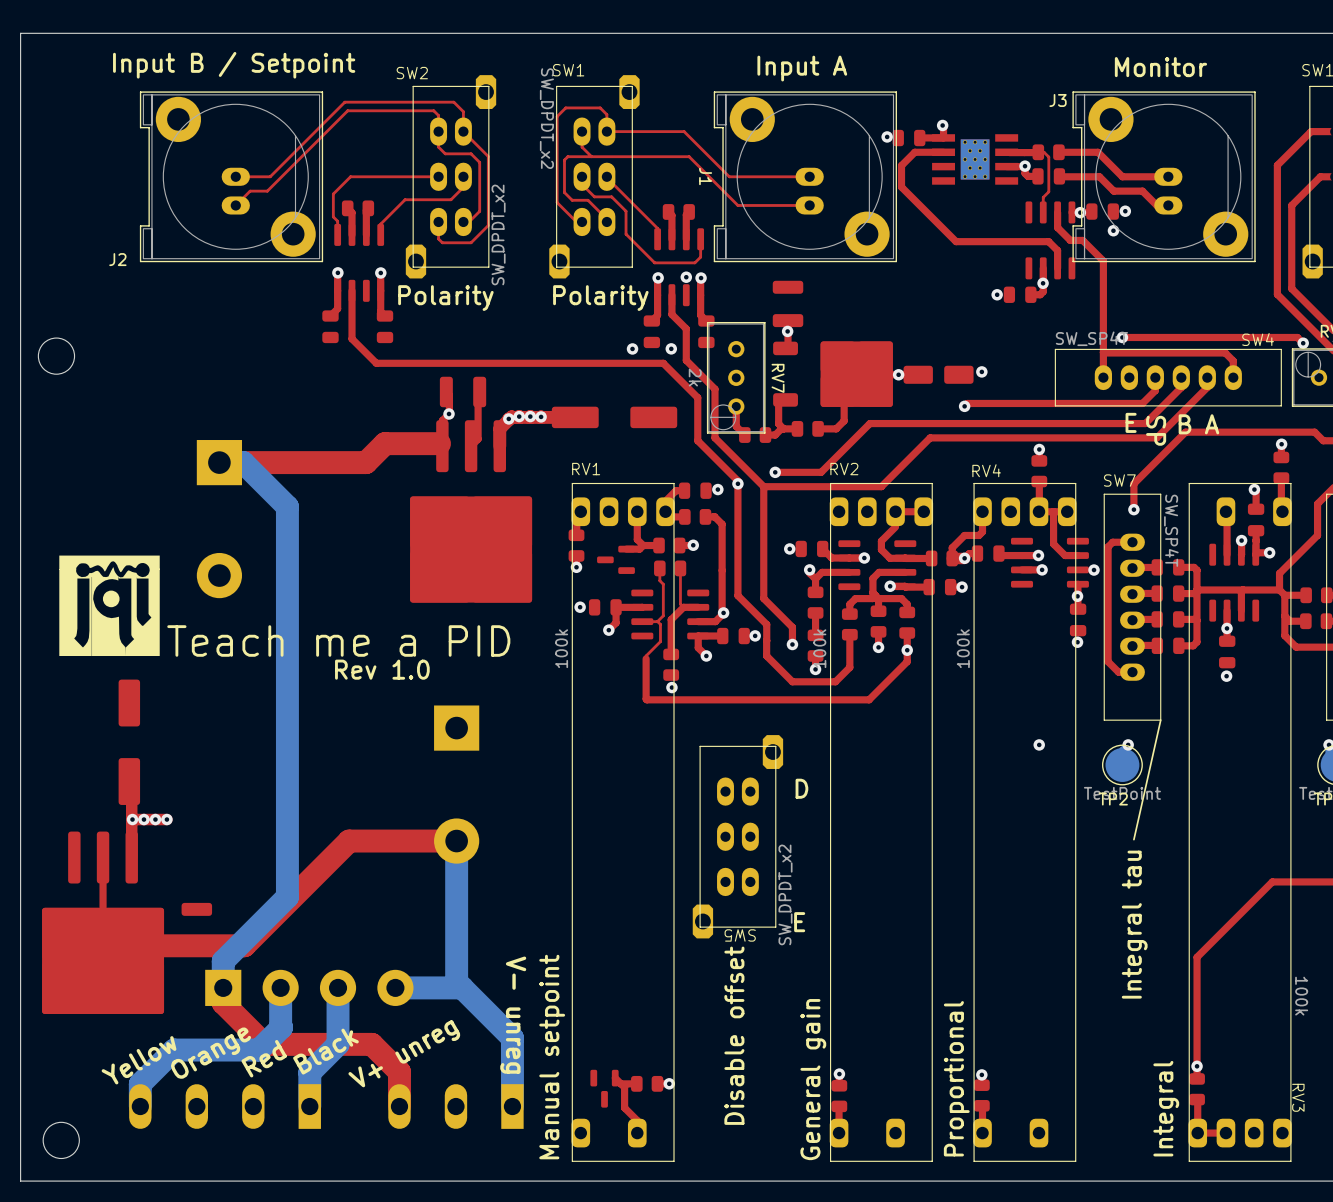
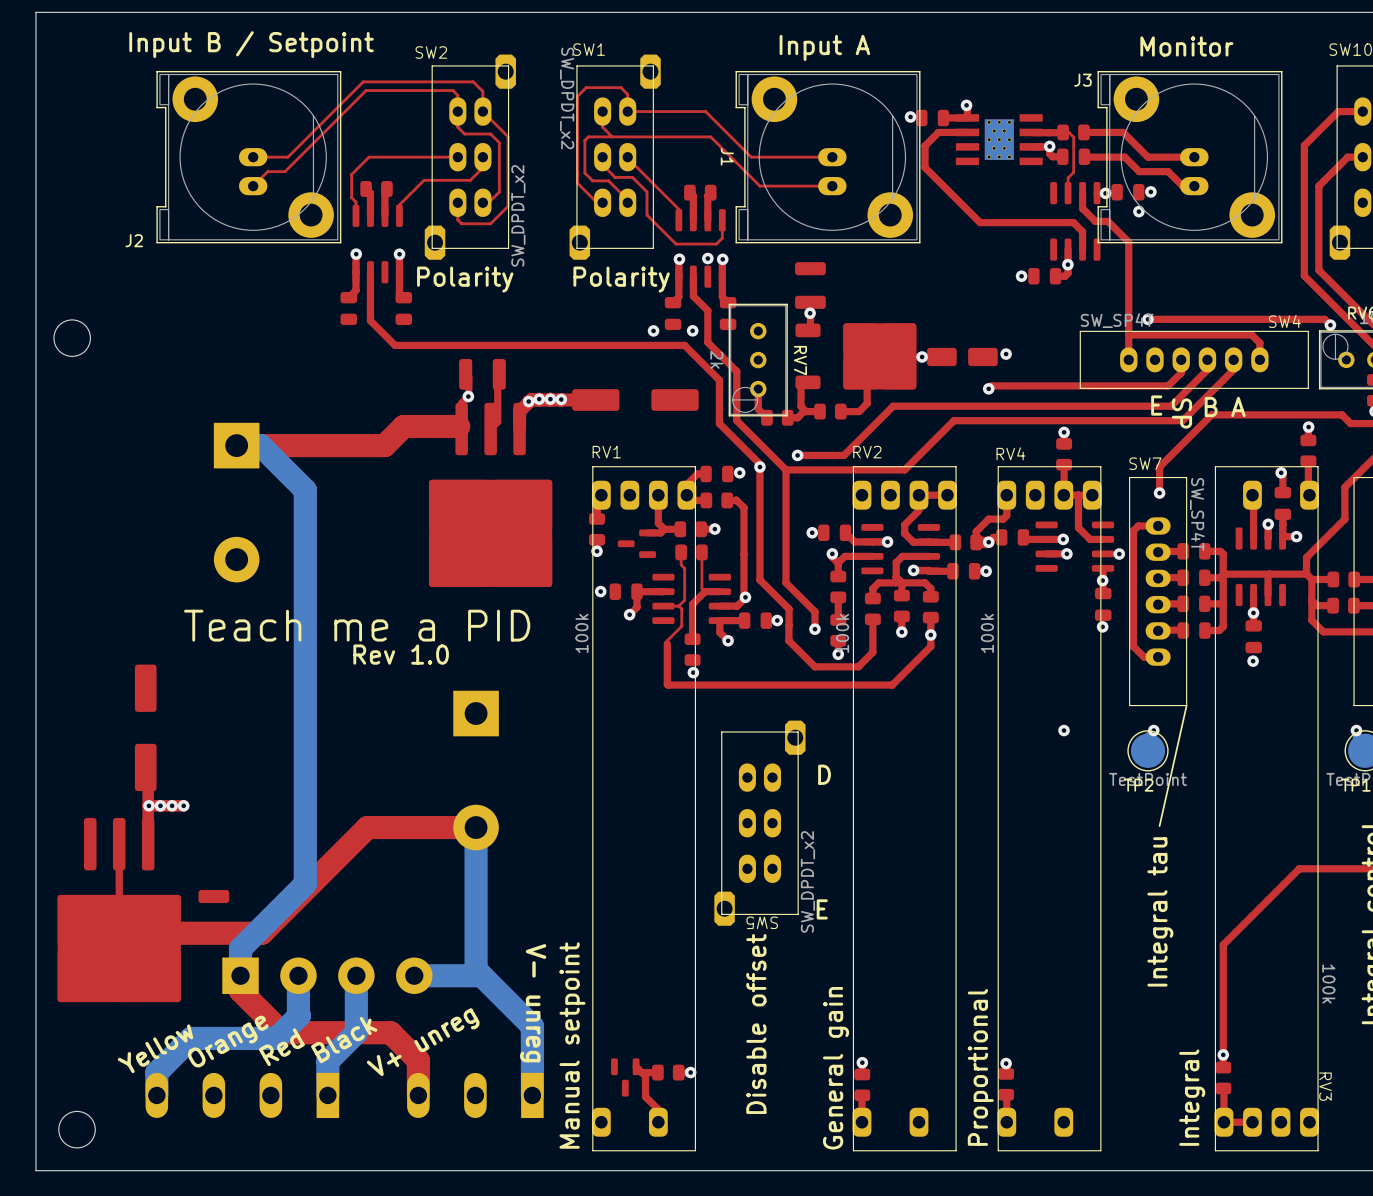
drawing: [59, 555, 160, 657] -> none

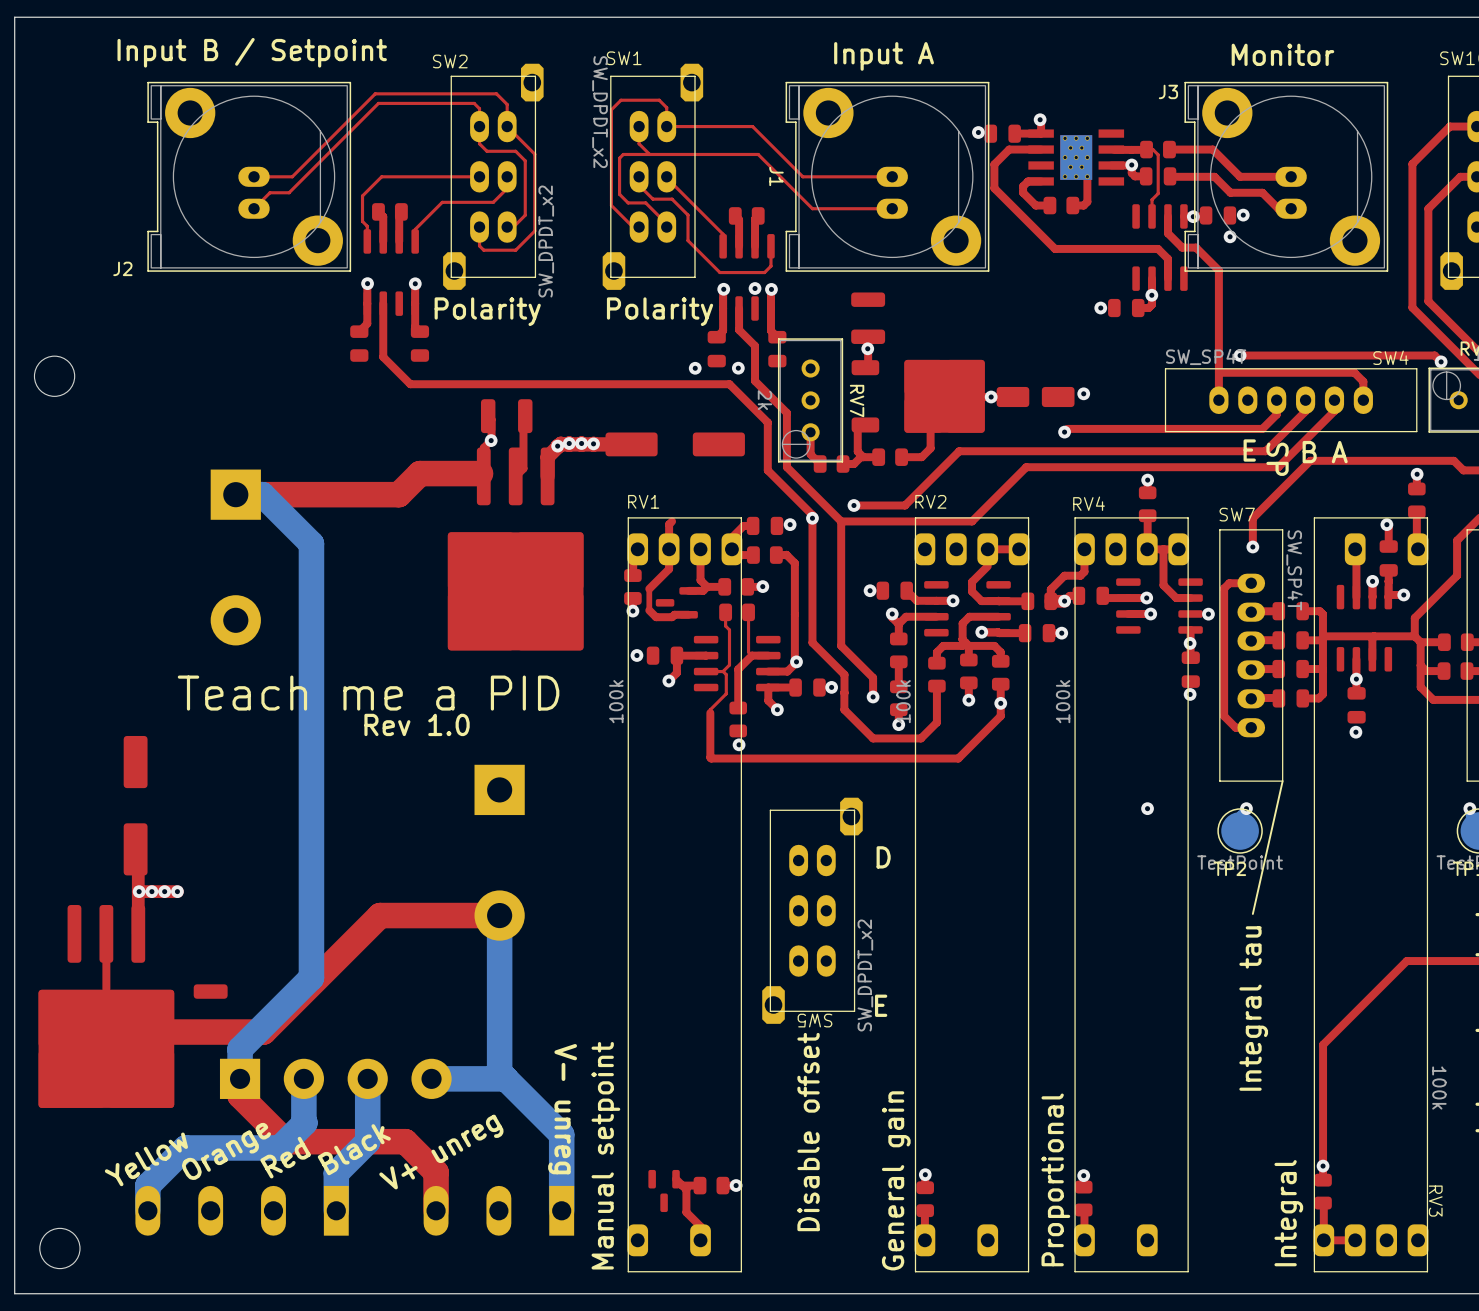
top track: none -> (1087, 176) (1087, 201) (1083, 205) (1072, 205)
top track: none -> (1041, 181) (1028, 181) (1023, 186) (1023, 192) (1035, 205) (1049, 205)
part: none -> (1061, 205)
top track: none -> (672, 521) (669, 524) (669, 569) (649, 588) (649, 610) (656, 617) (688, 614)

